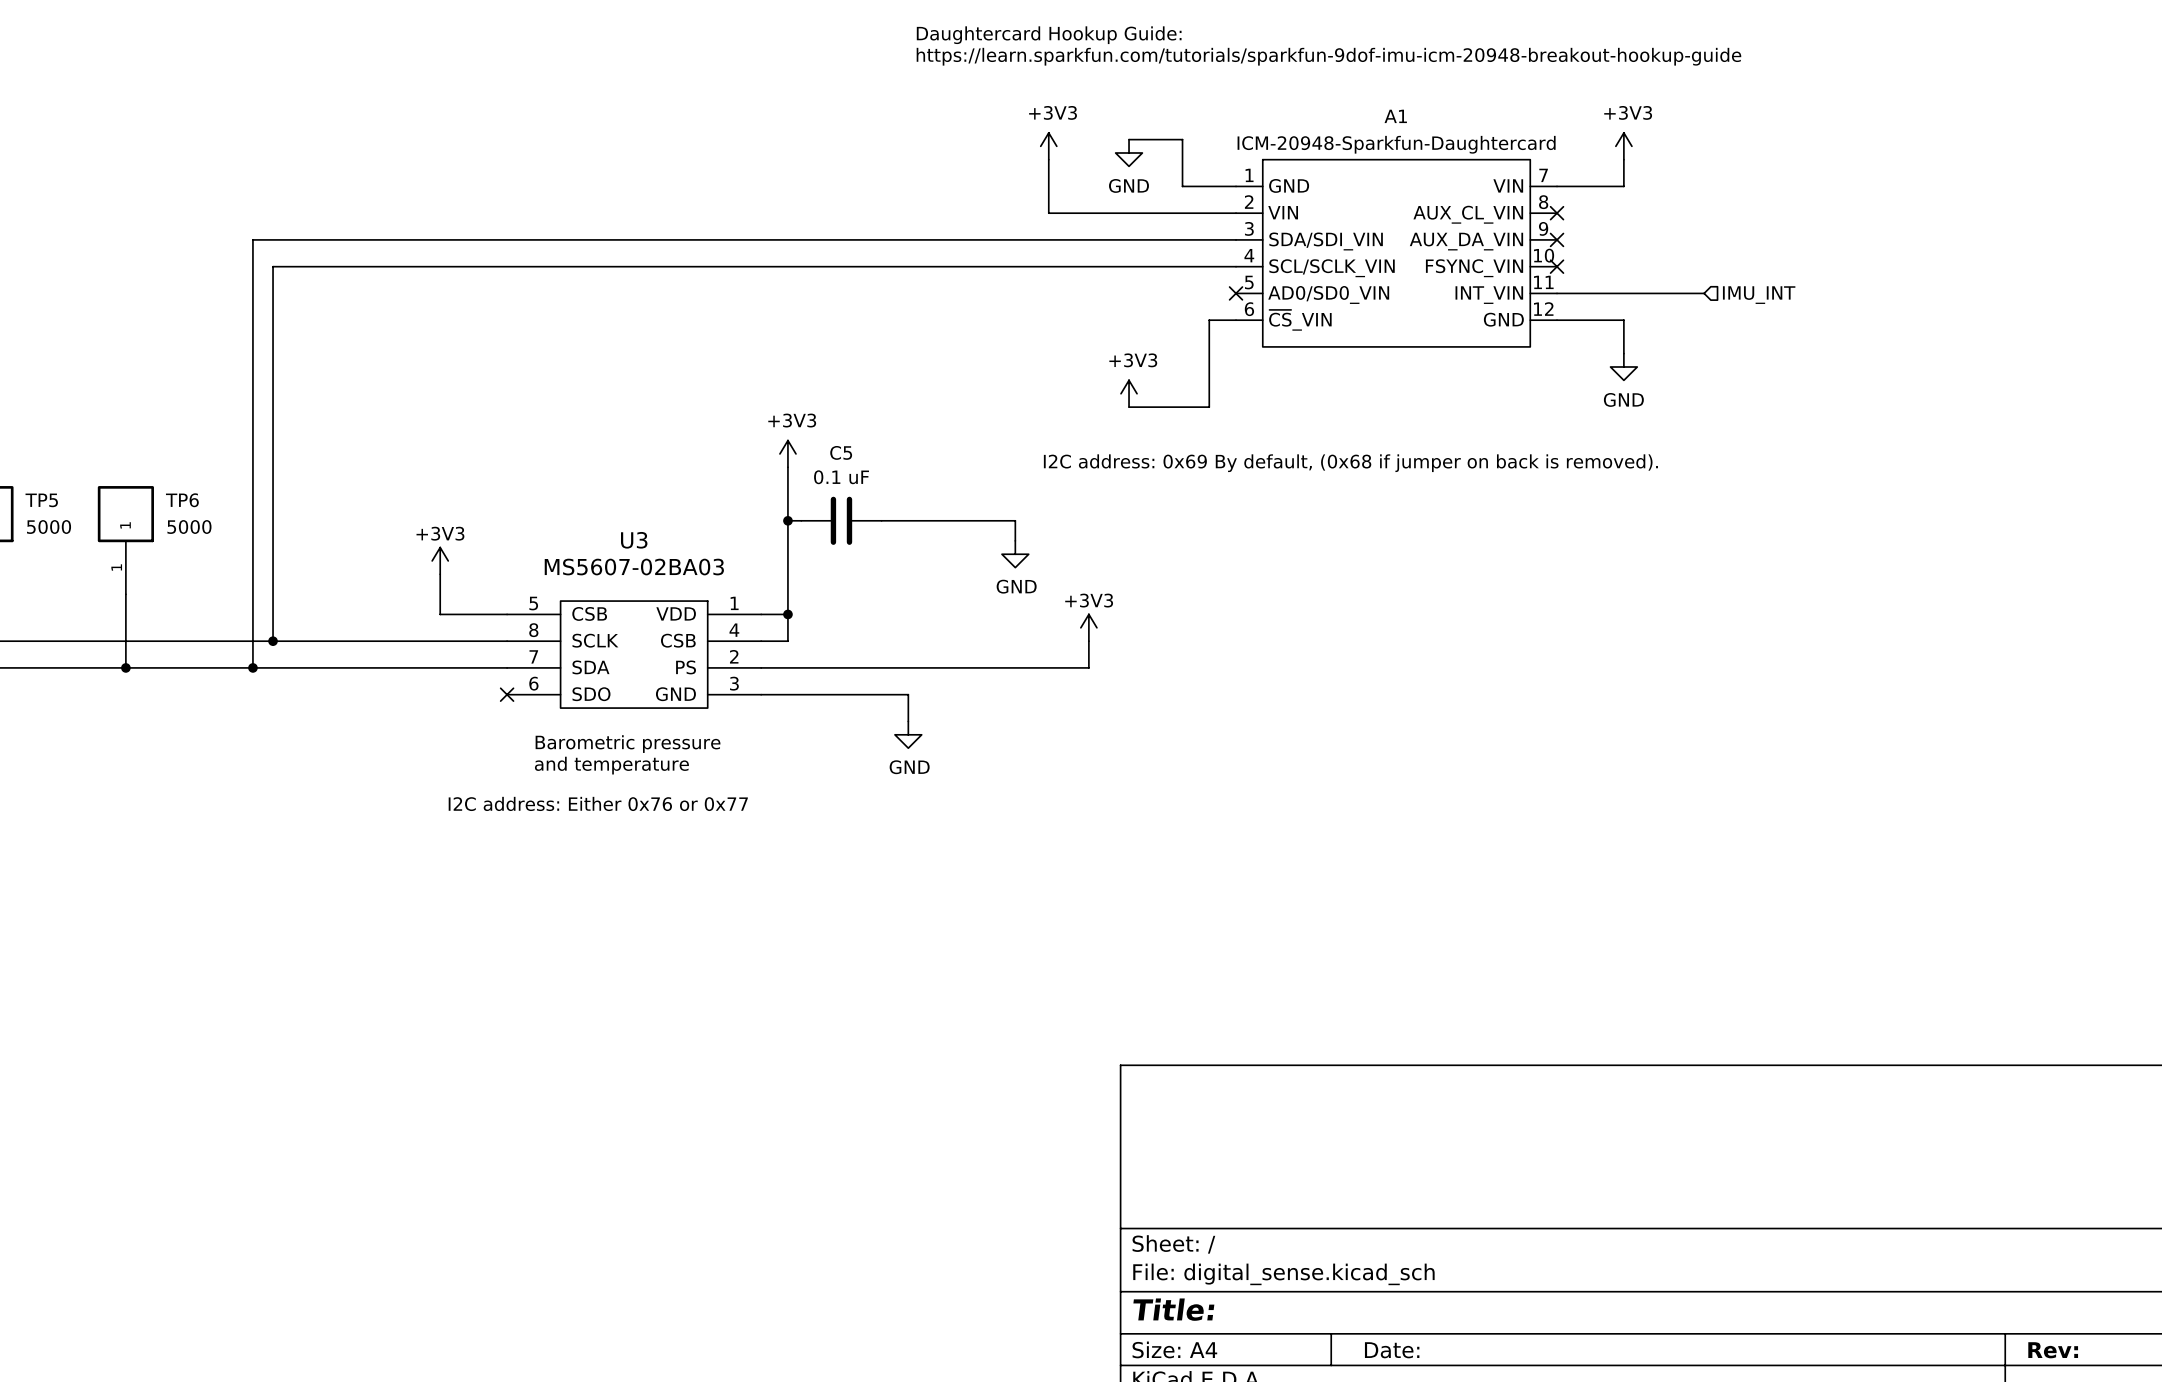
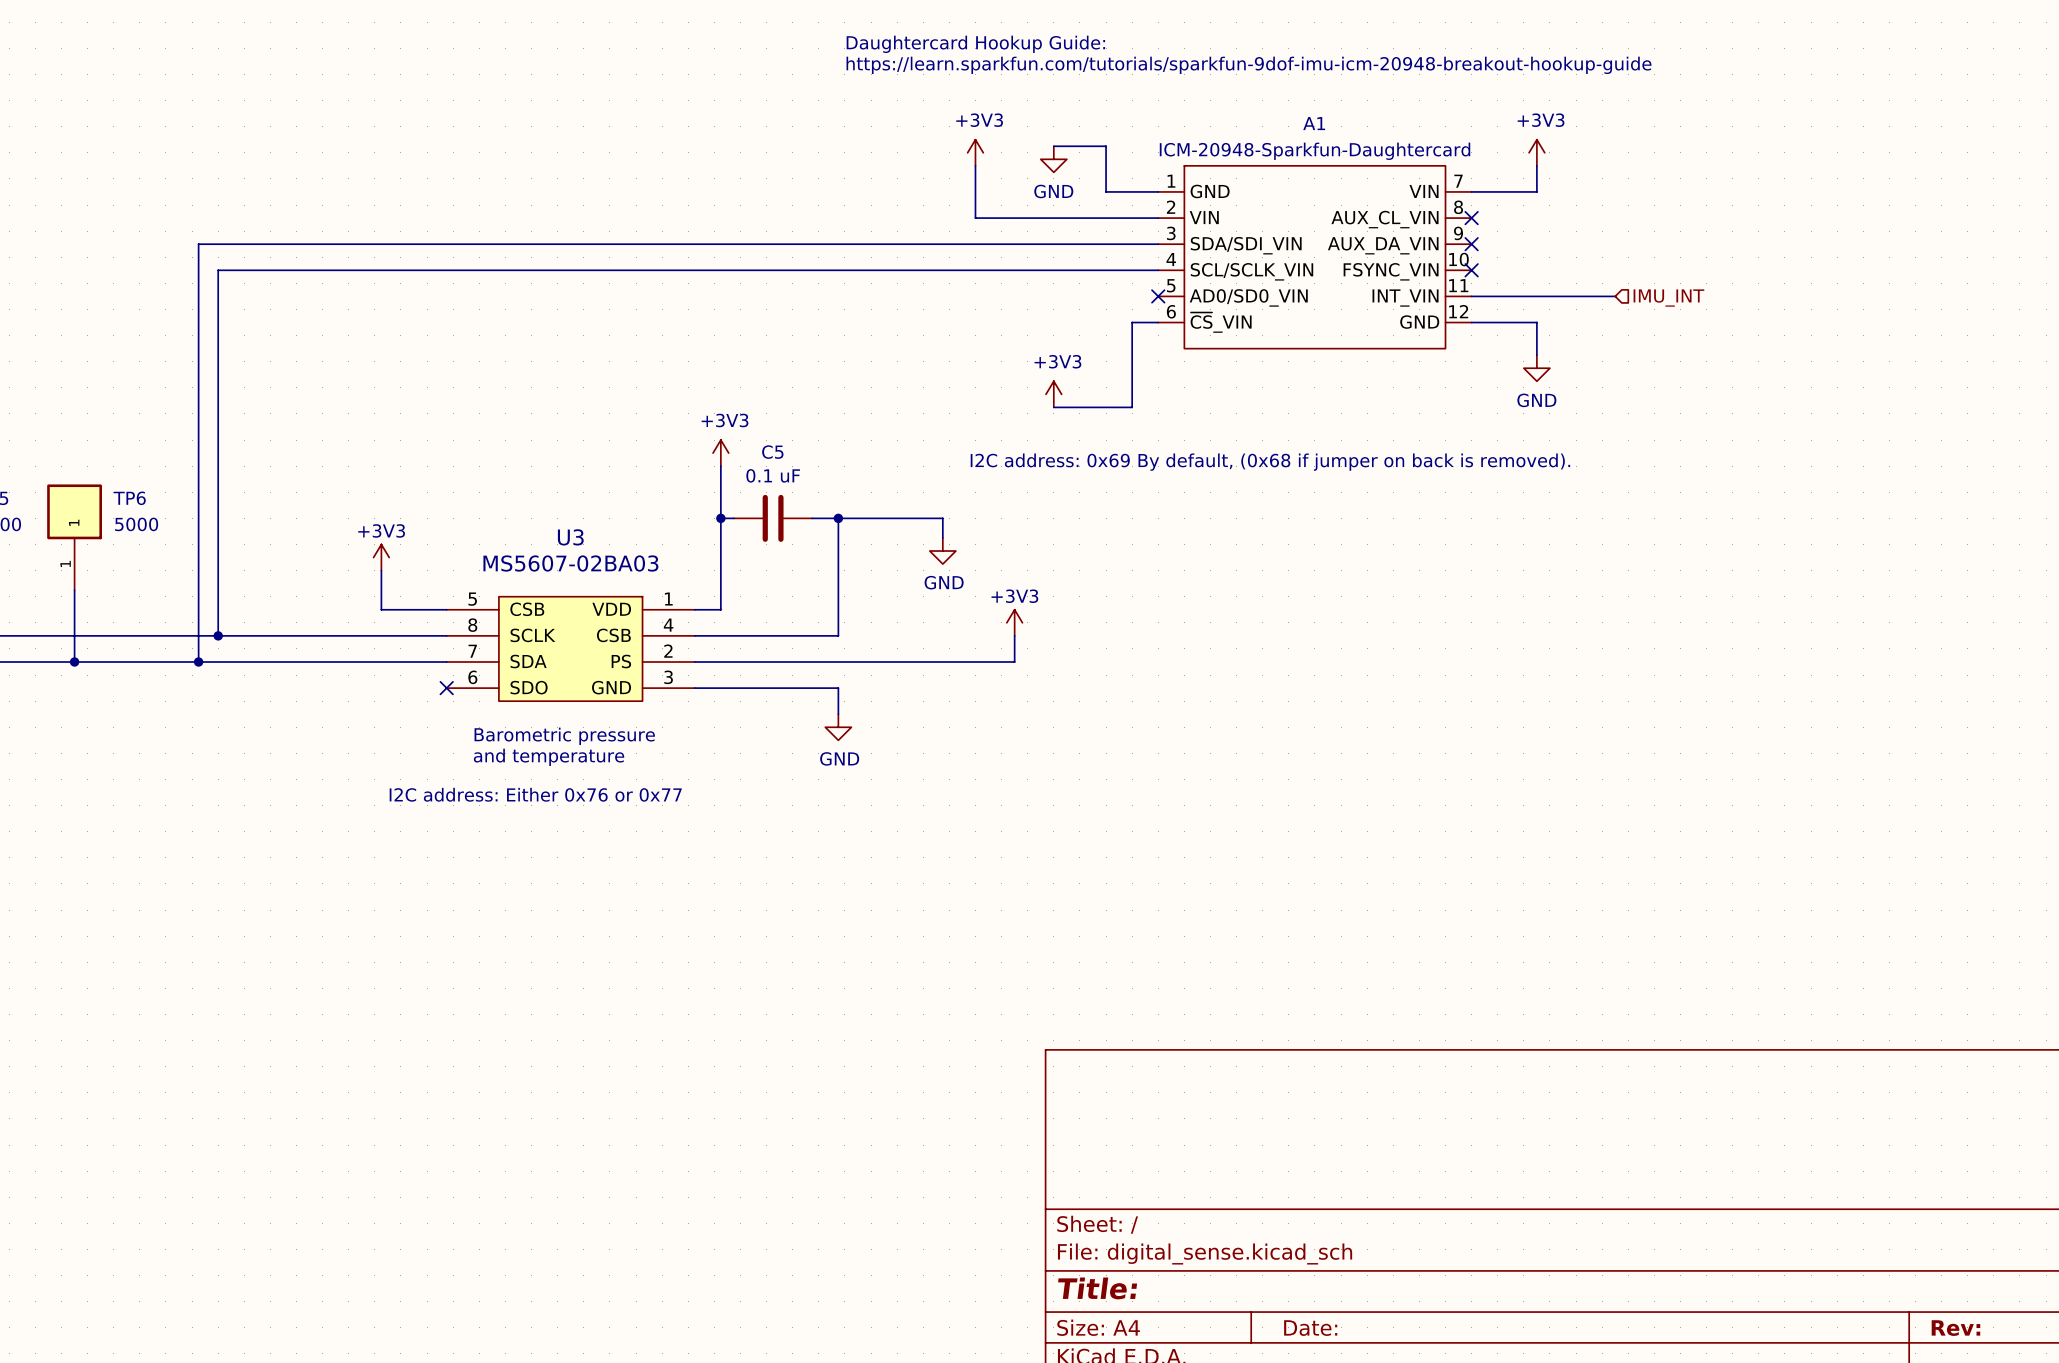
junction: none -> (838, 518)
wire: (787, 614) (787, 641) -> (838, 518) (838, 635) (720, 635)
junction: (787, 614) -> none

